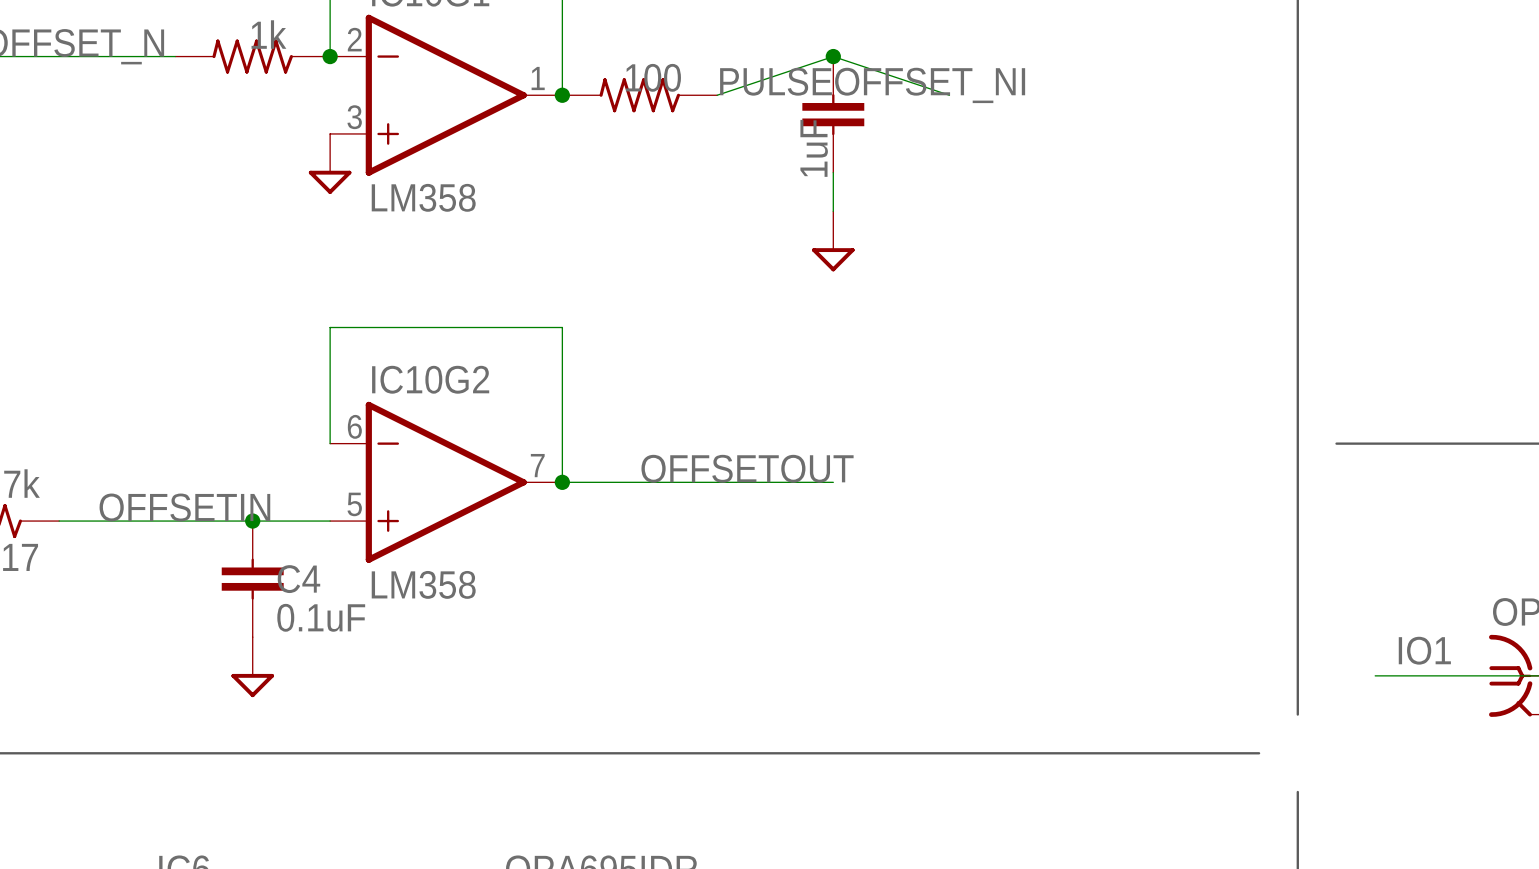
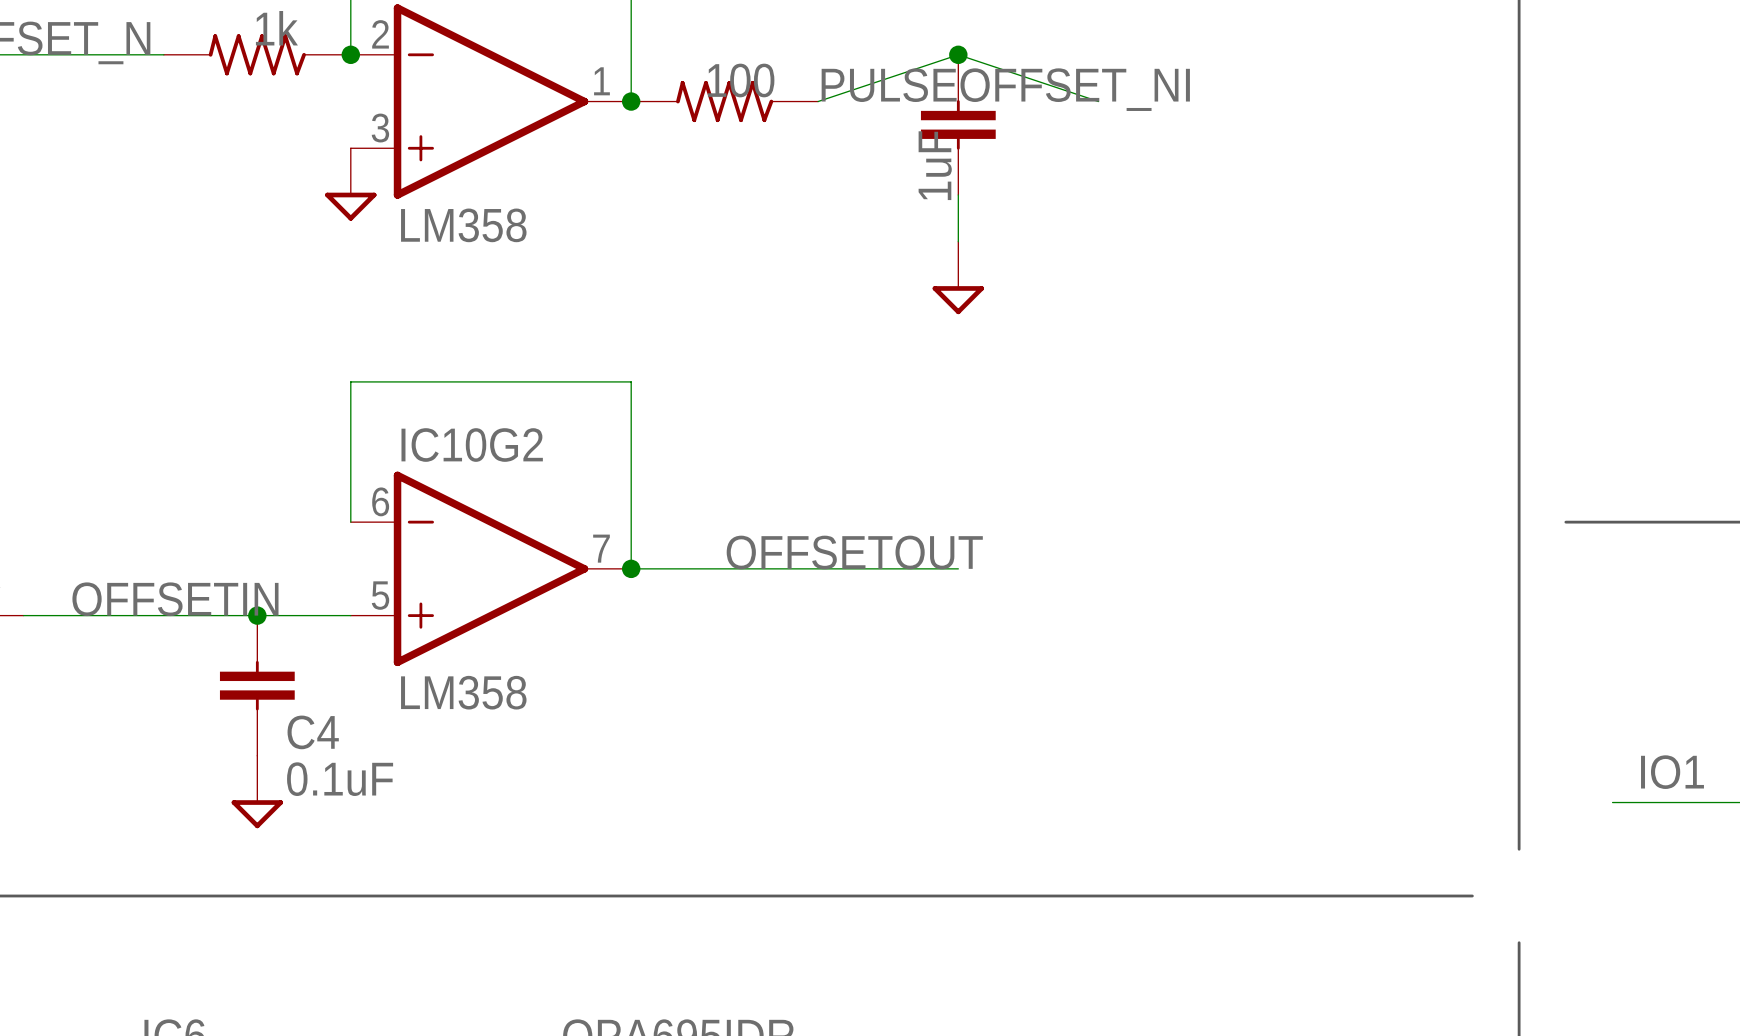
C4 name position: C4 (298, 579) -> C4 (313, 732)
C4 value position: 0.1uF (321, 617) -> 0.1uF (340, 779)

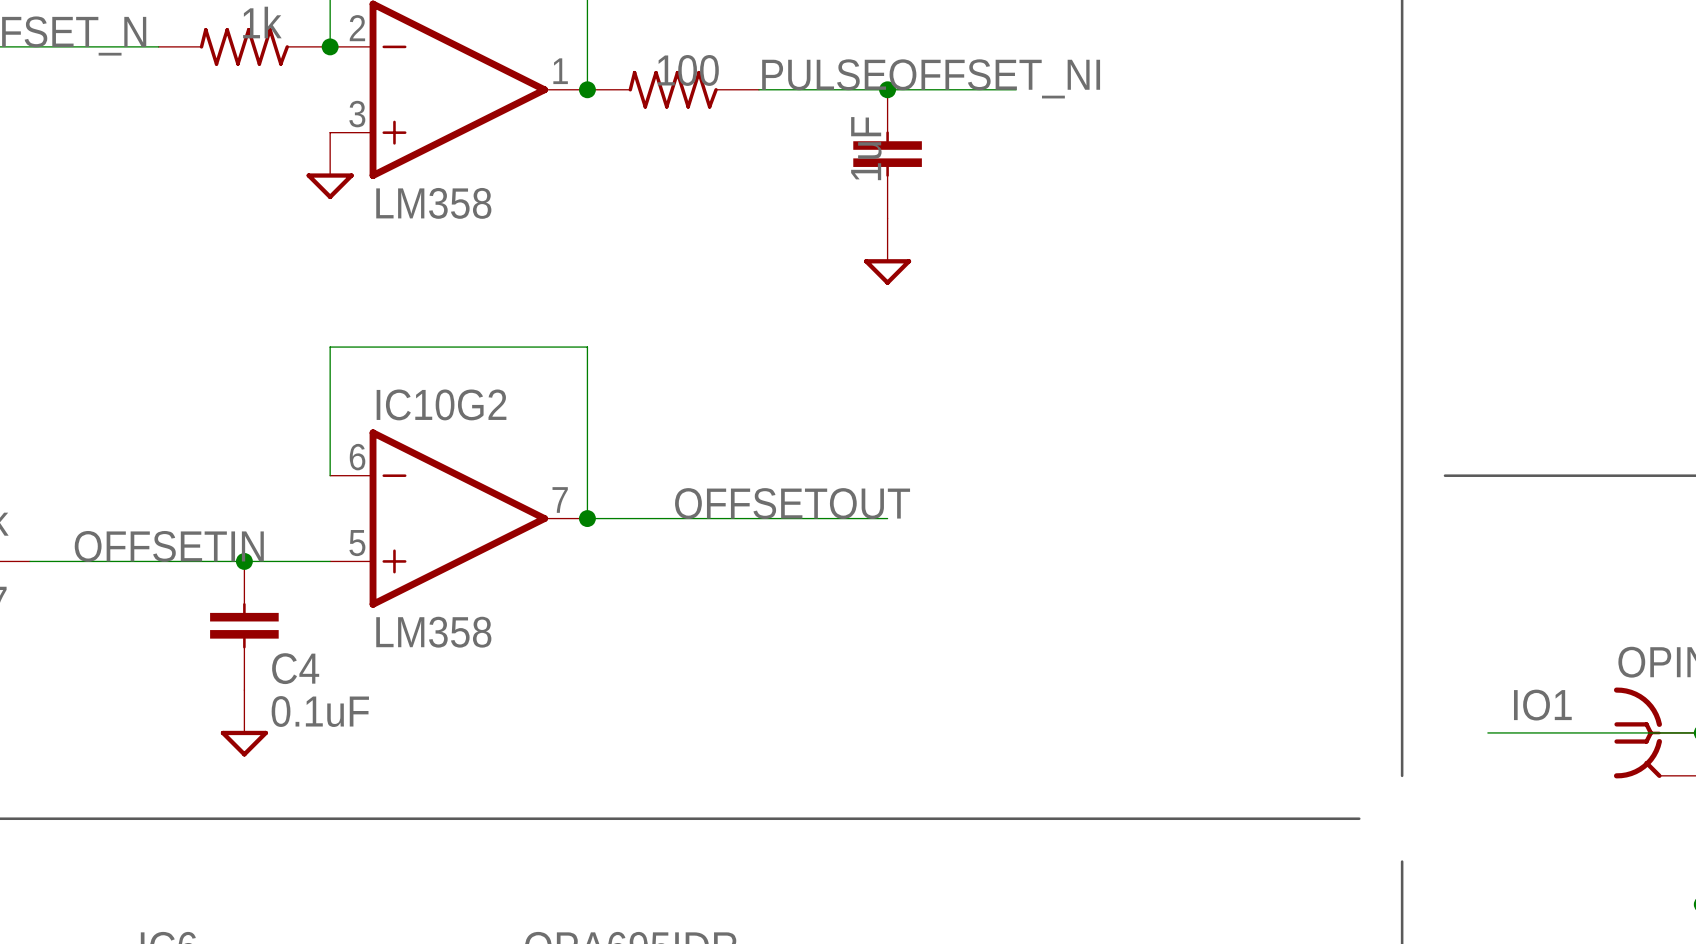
junction position: (958, 54) -> (887, 89)
wire: (818, 101) (958, 54) (1098, 101) -> (758, 89) (1016, 89)
part position: (958, 124) -> (887, 154)

